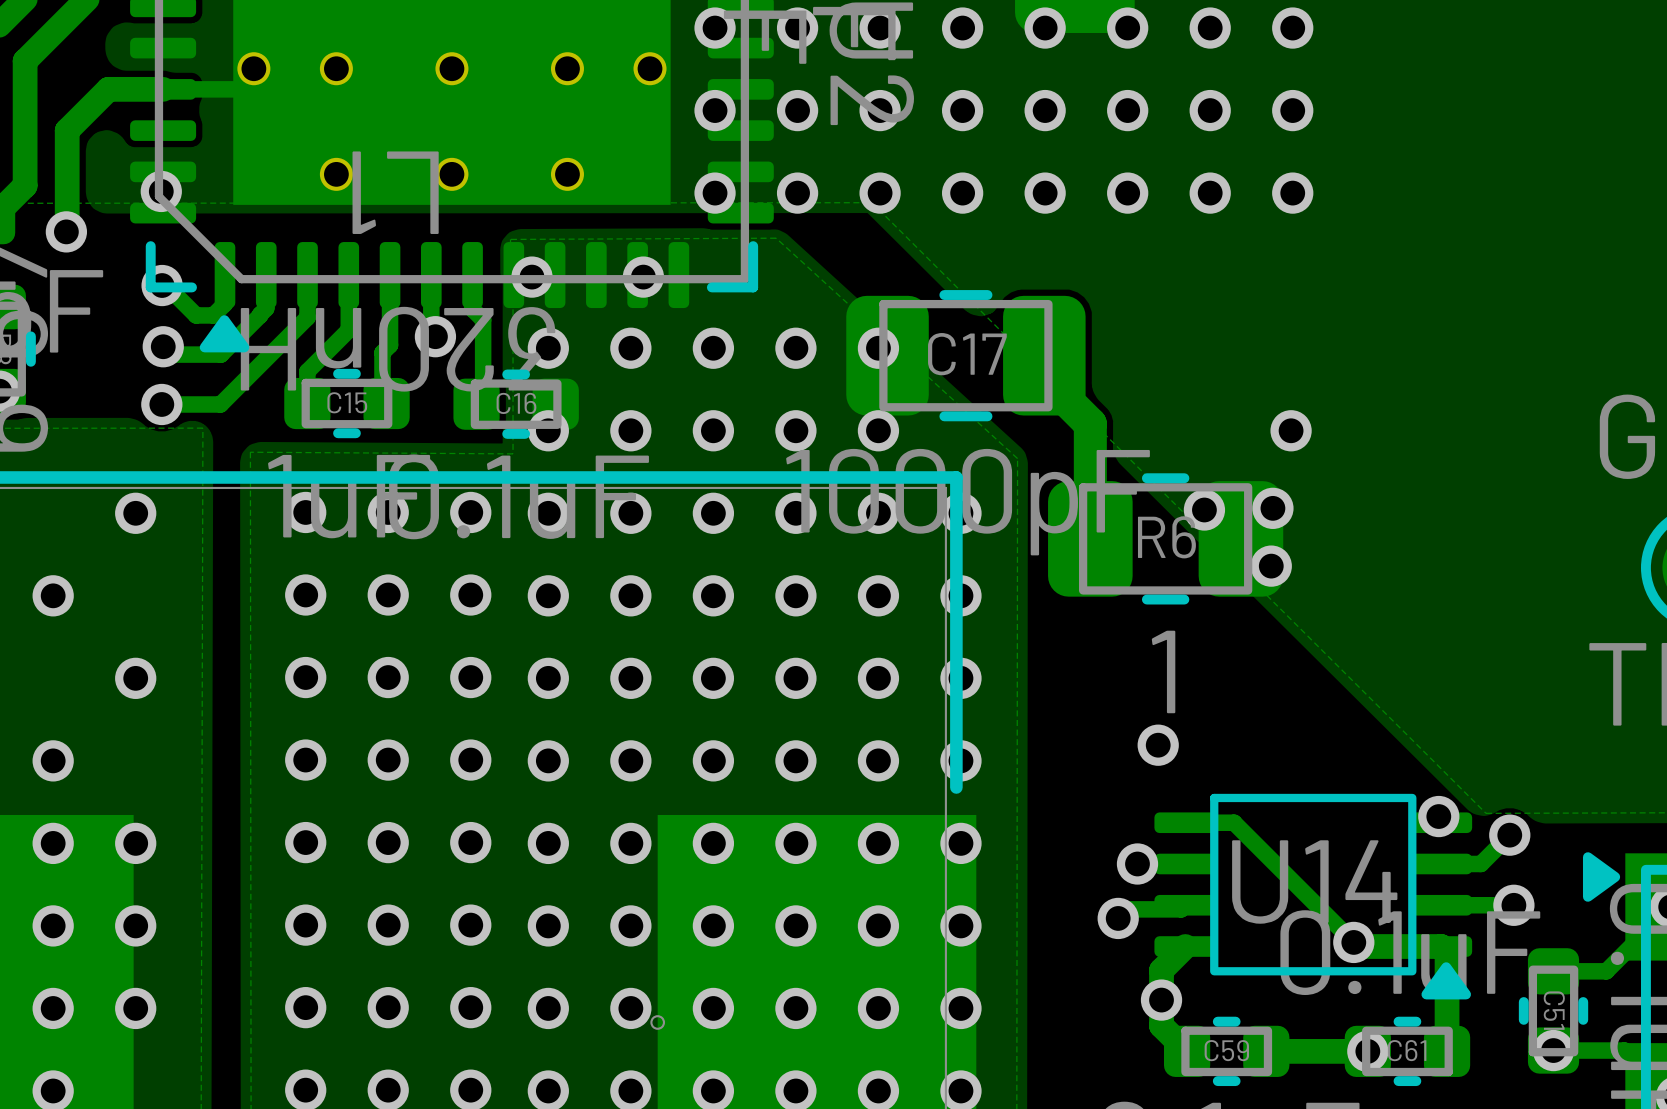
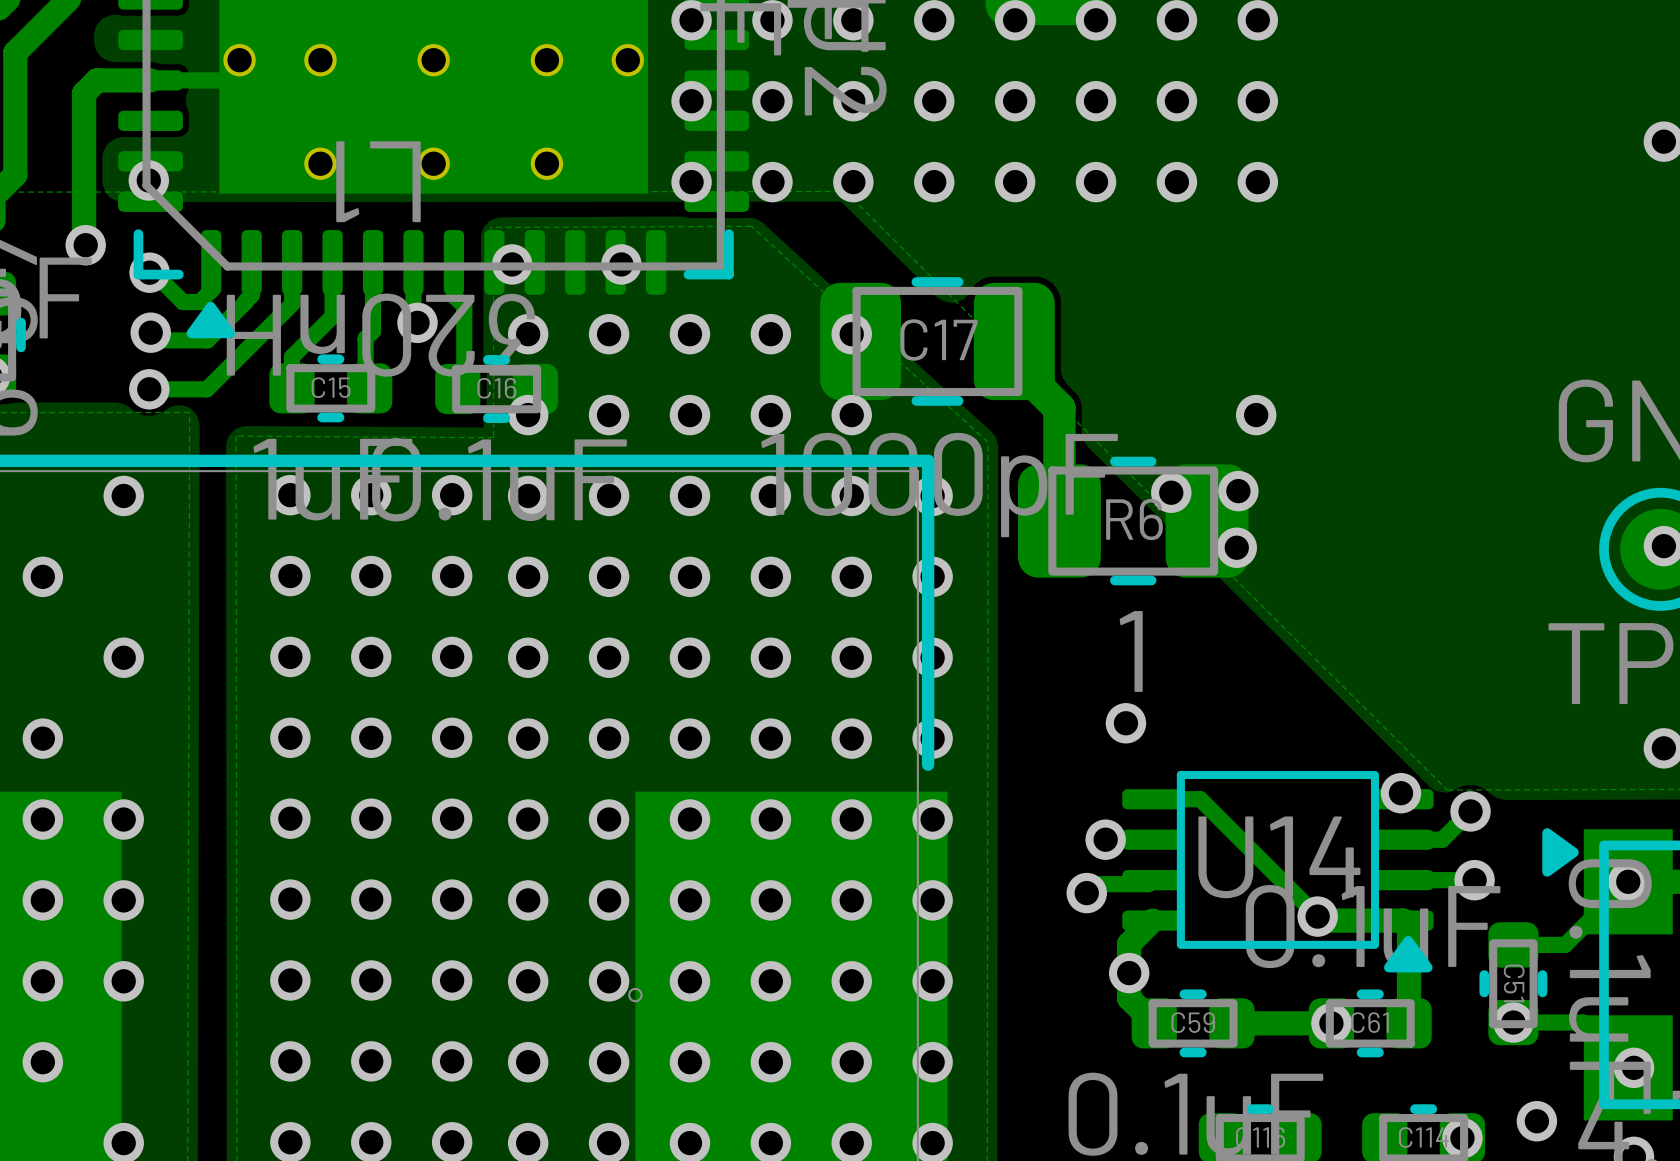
track: (95, 102) (67, 130) (67, 231) -> (84, 93) (84, 243) (85, 245)
via position: (66, 231) -> (85, 245)

